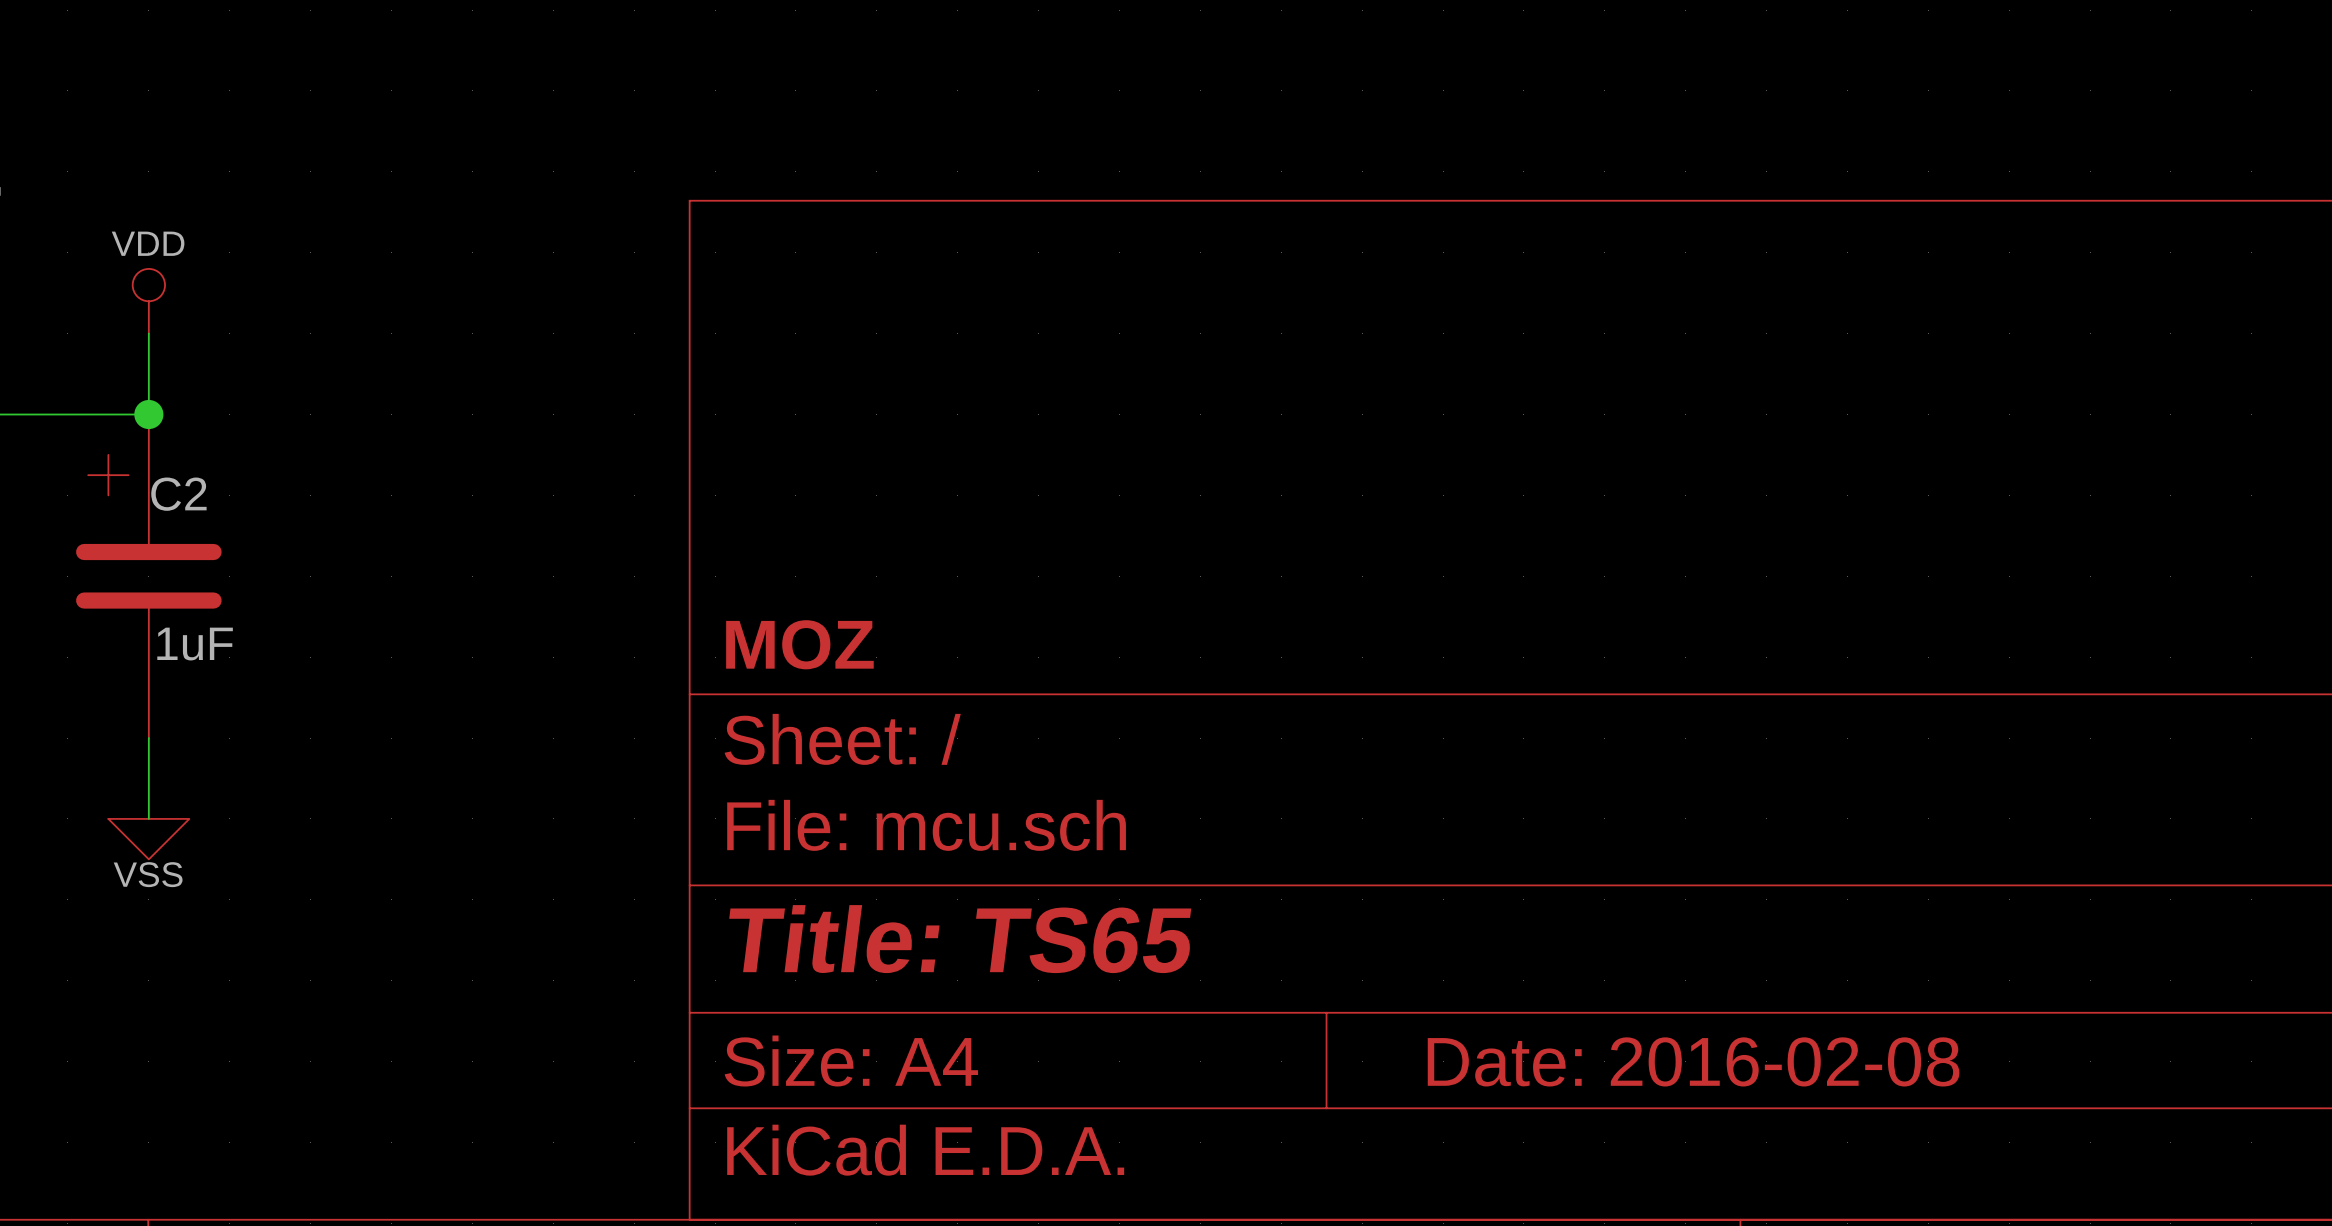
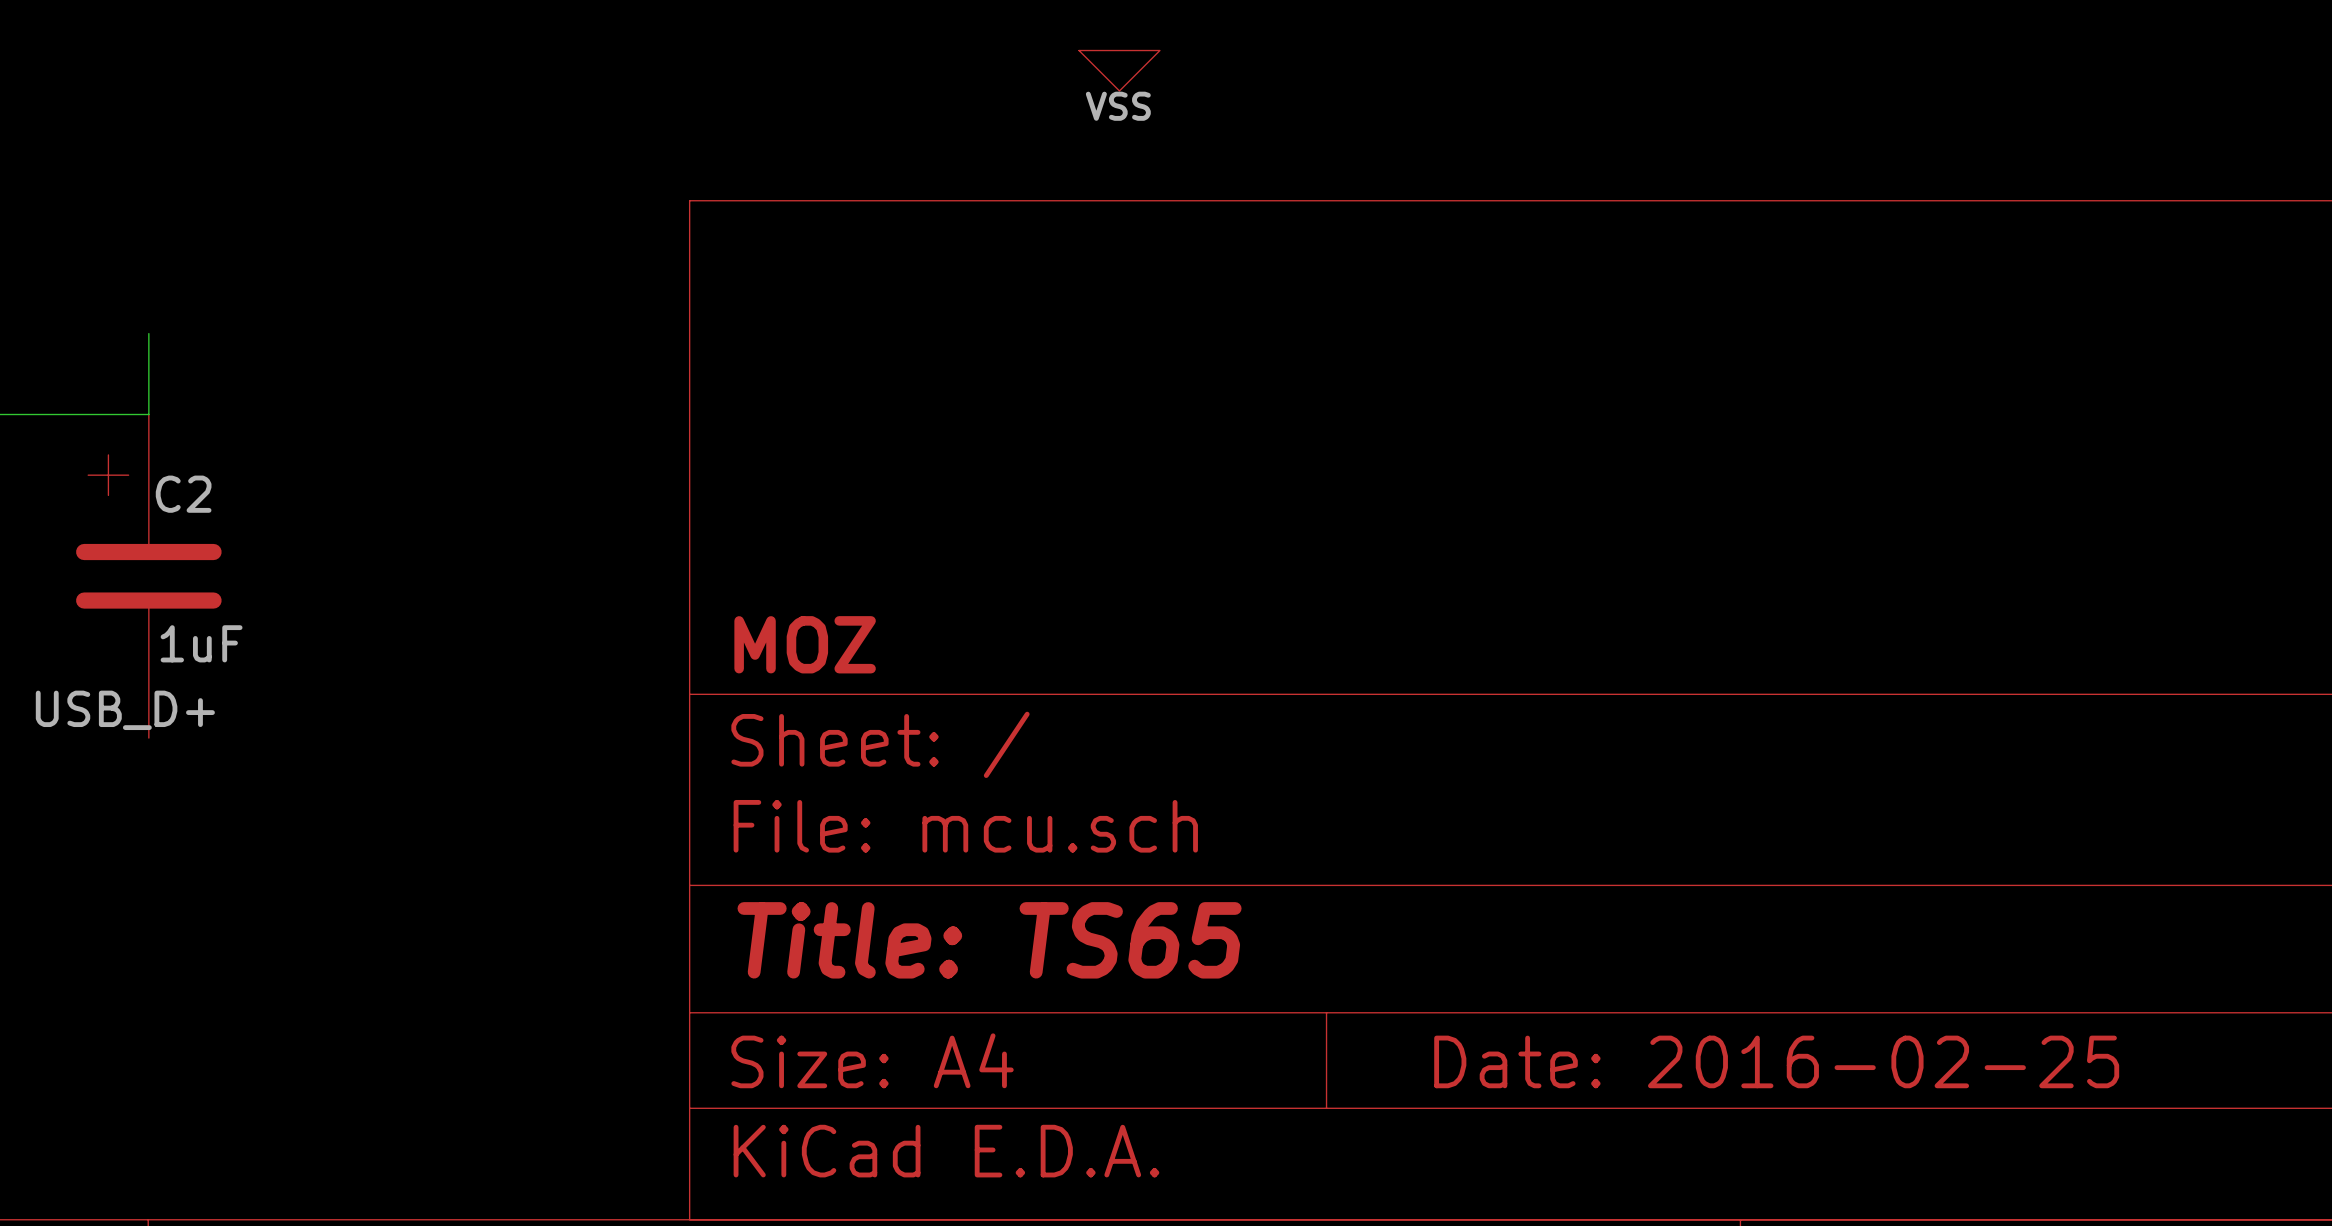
power symbol: none -> VSS (1119, 70)
power symbol: VDD (148, 301) -> none
junction: (148, 414) -> none
label: none -> USB_D+ (125, 710)
wire: (148, 738) (148, 818) -> none
power symbol: VSS (148, 839) -> none
title block: Date: 2016-02-08 (1693, 1061) -> Date: 2016-02-25 (1776, 1061)

